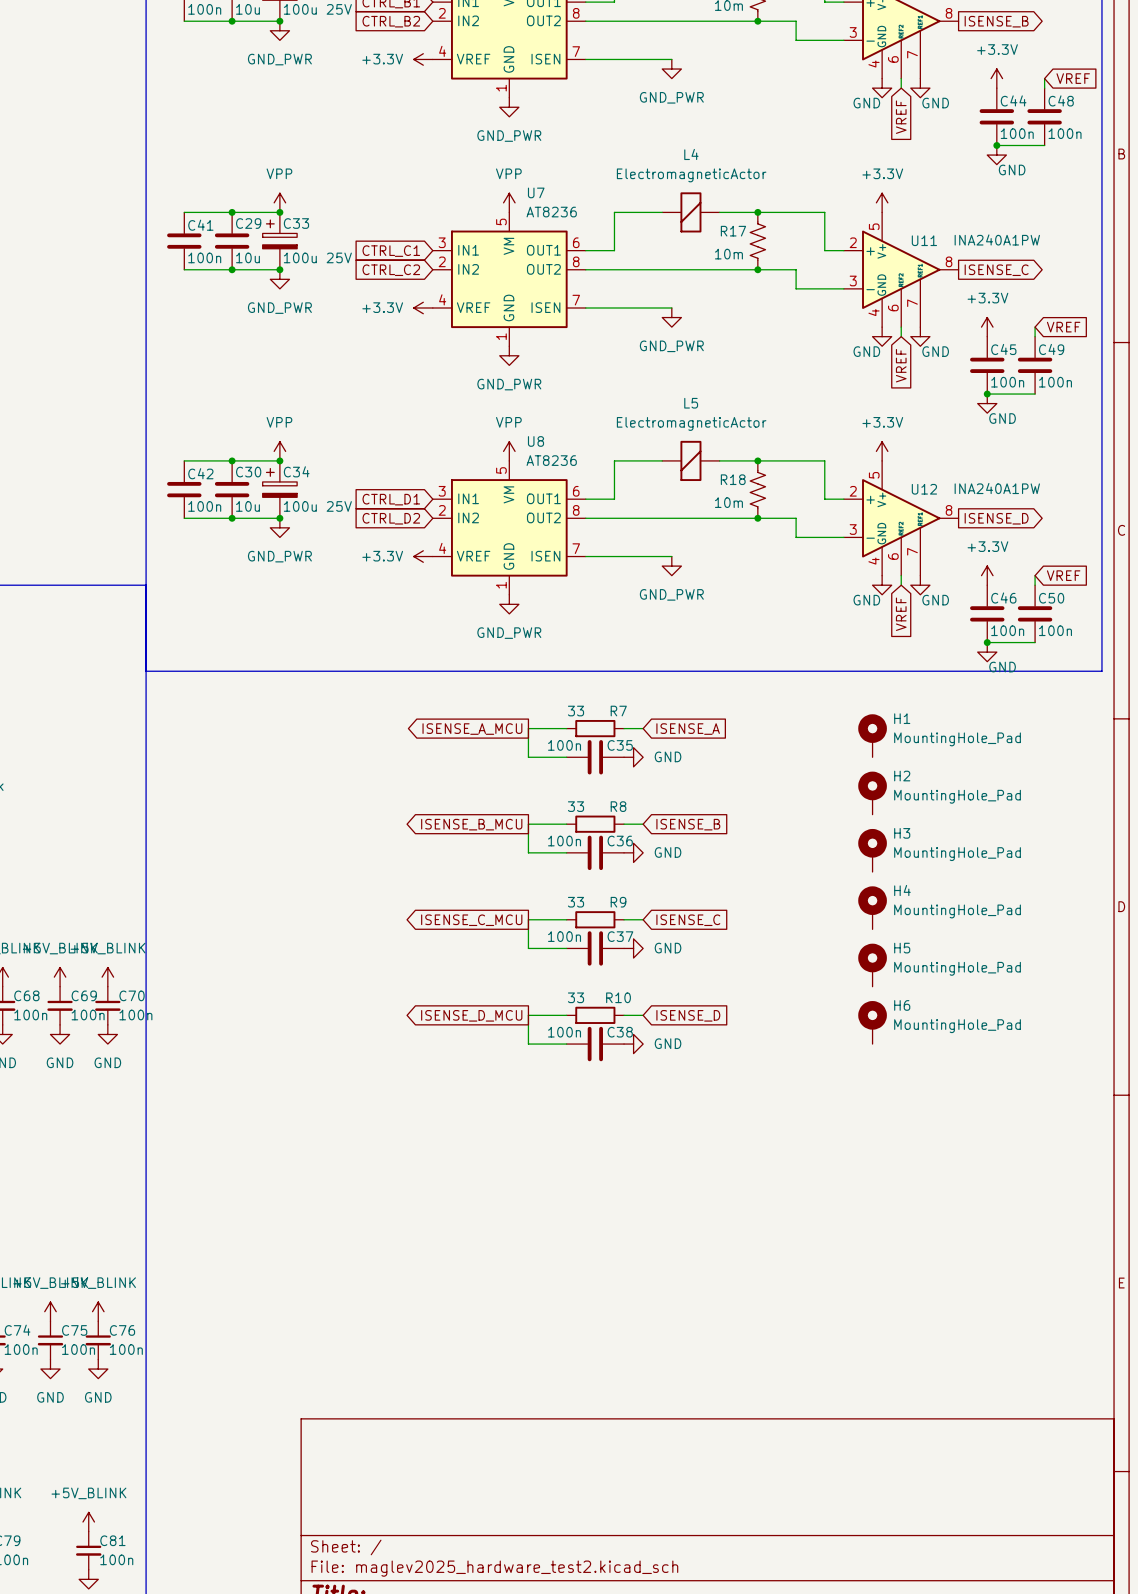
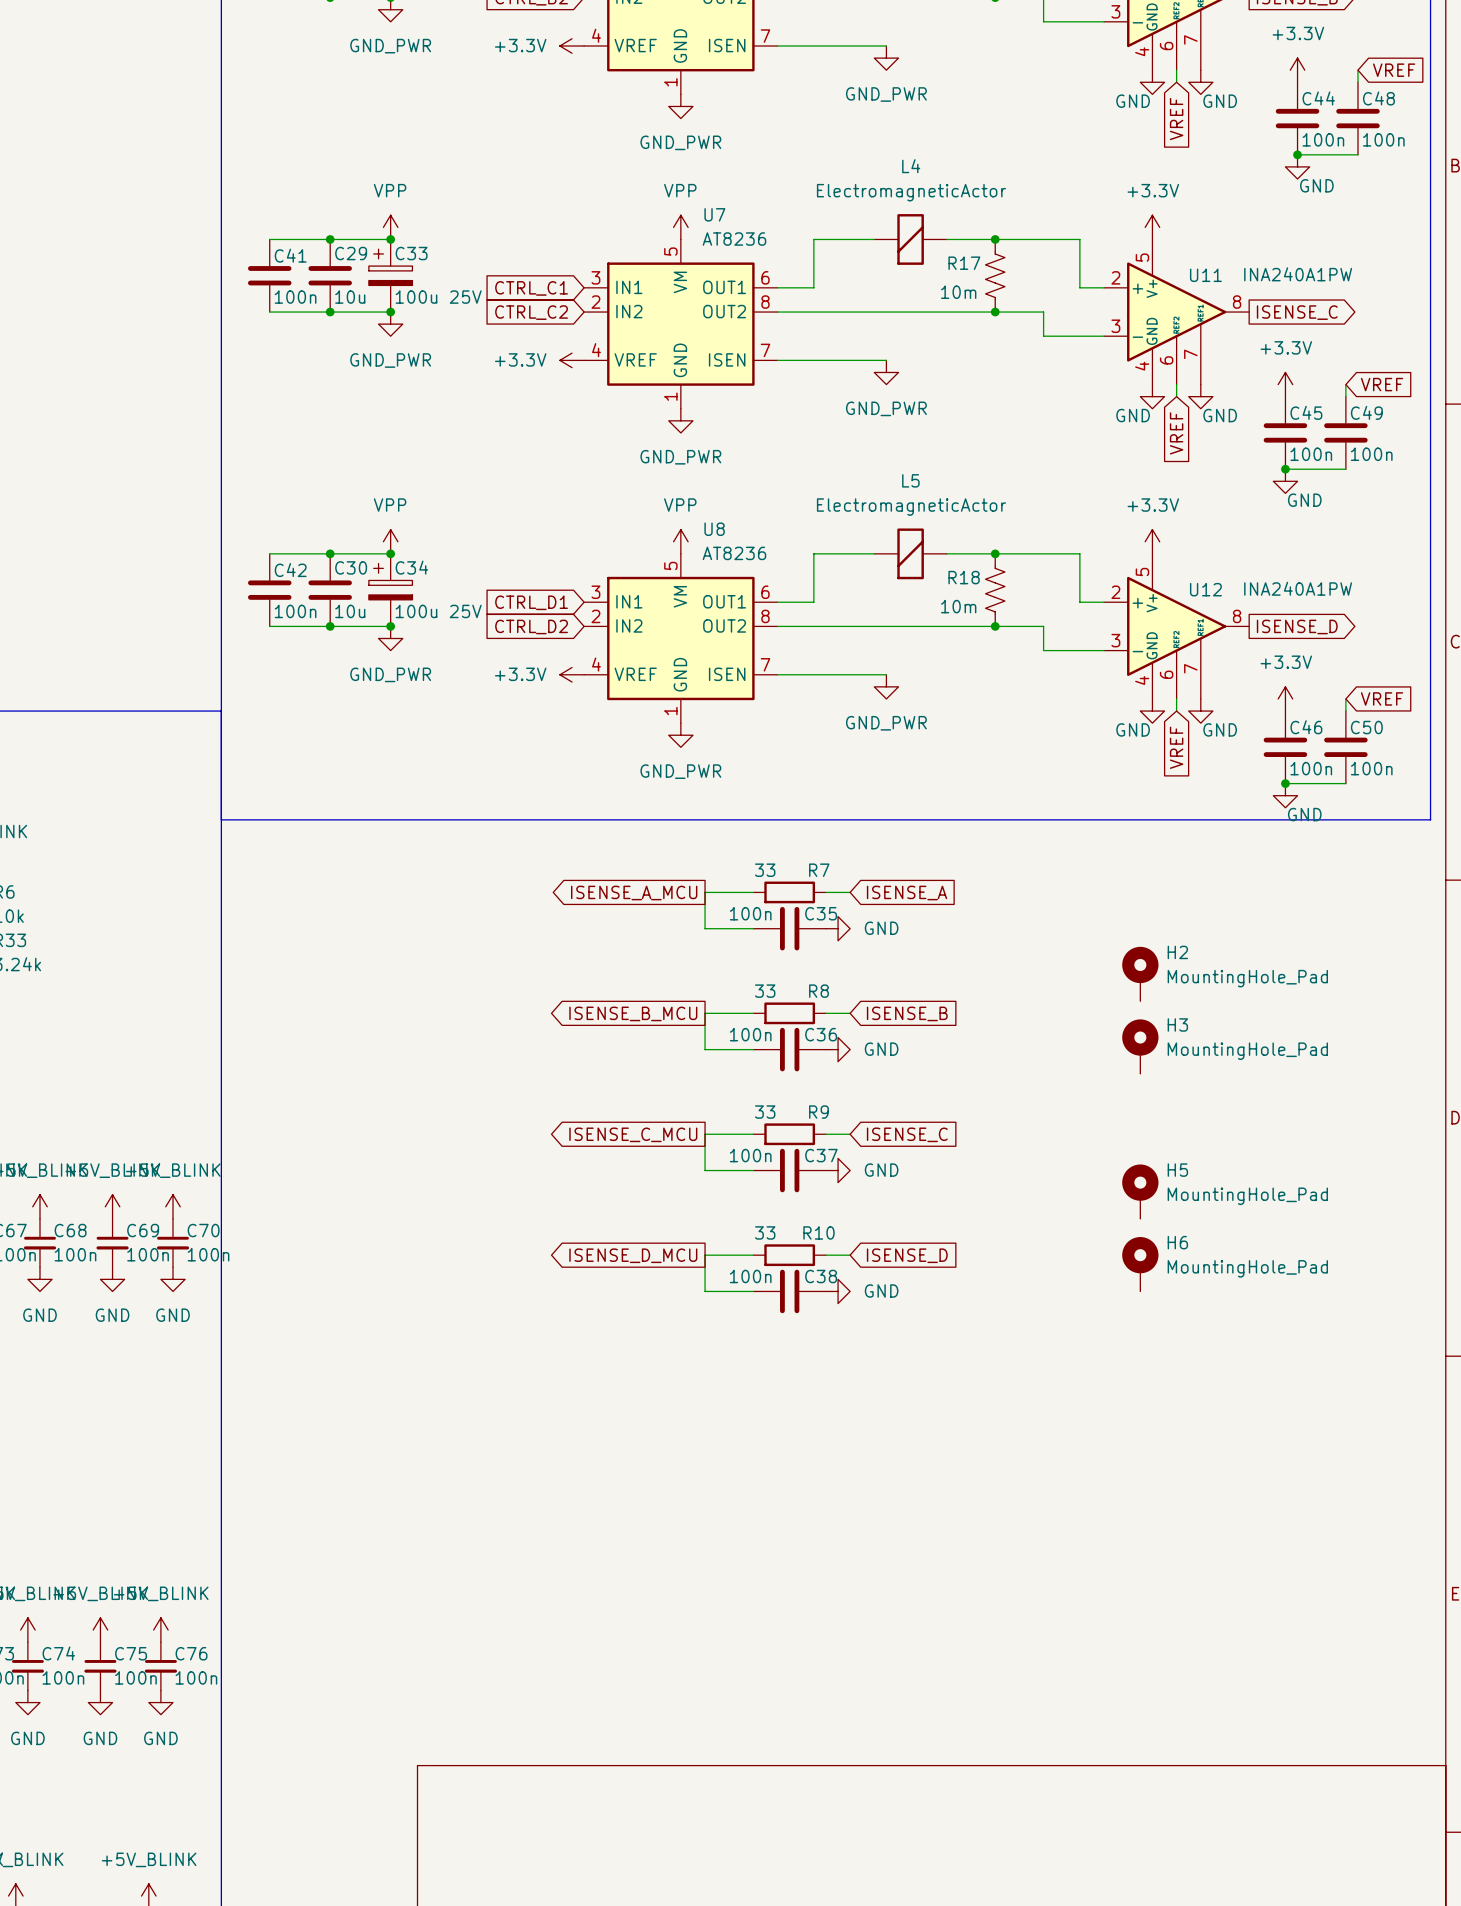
H1: MountingHole_Pad (872, 735) -> none
H4: MountingHole_Pad (872, 907) -> none

